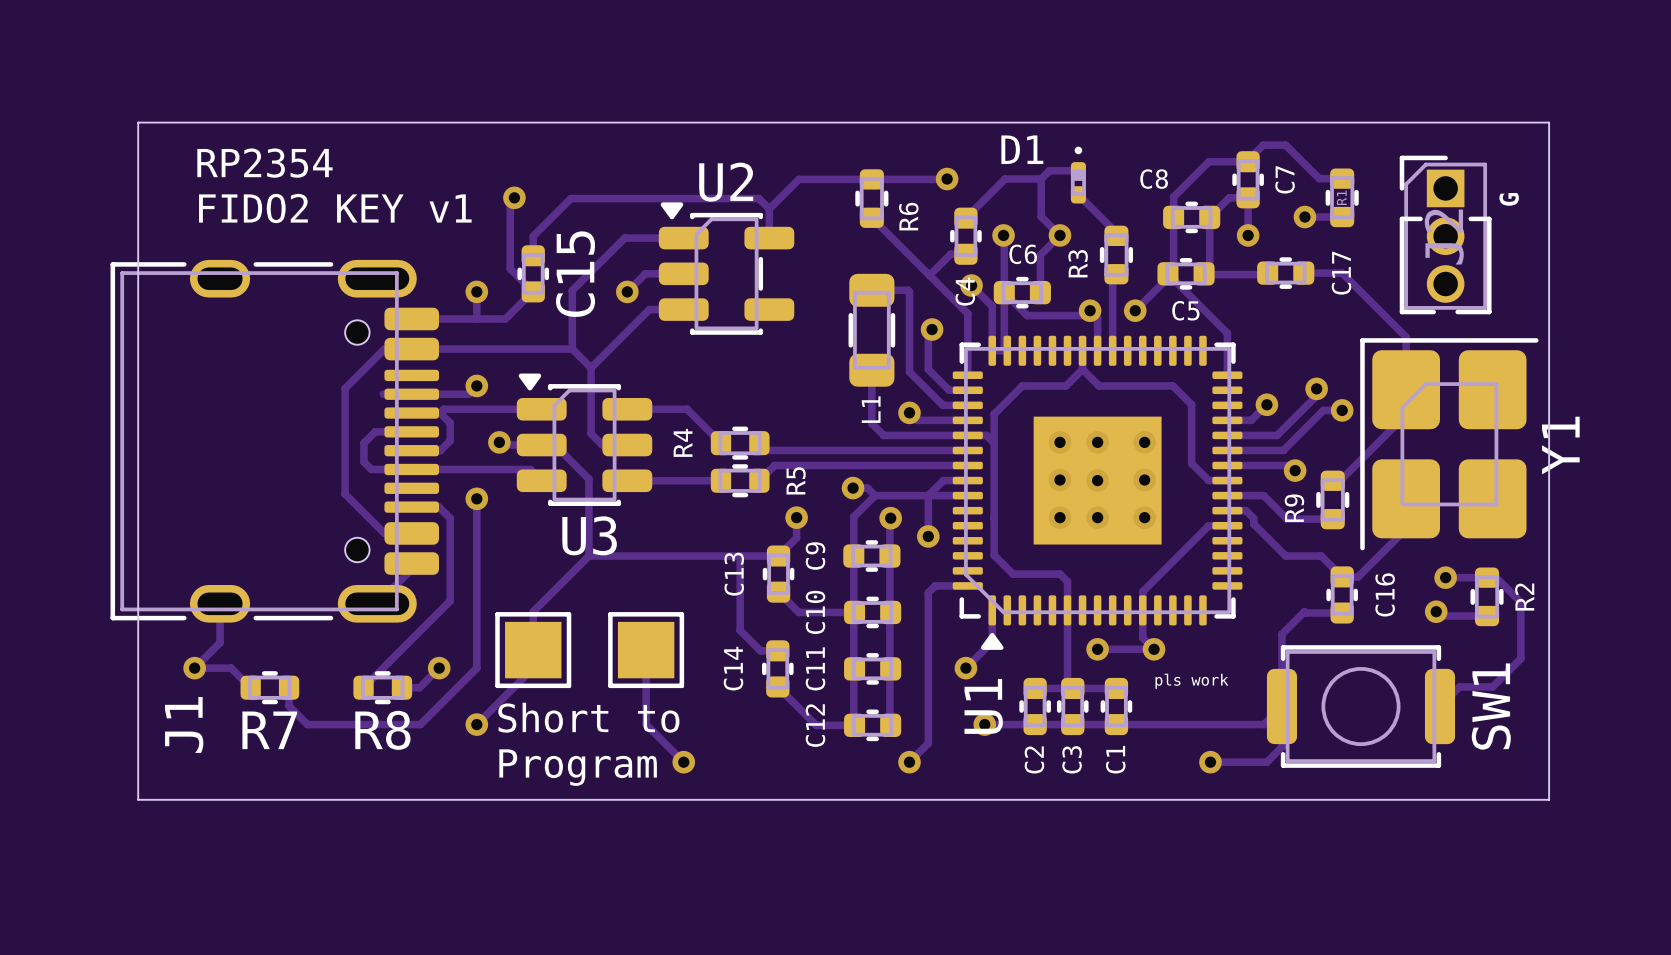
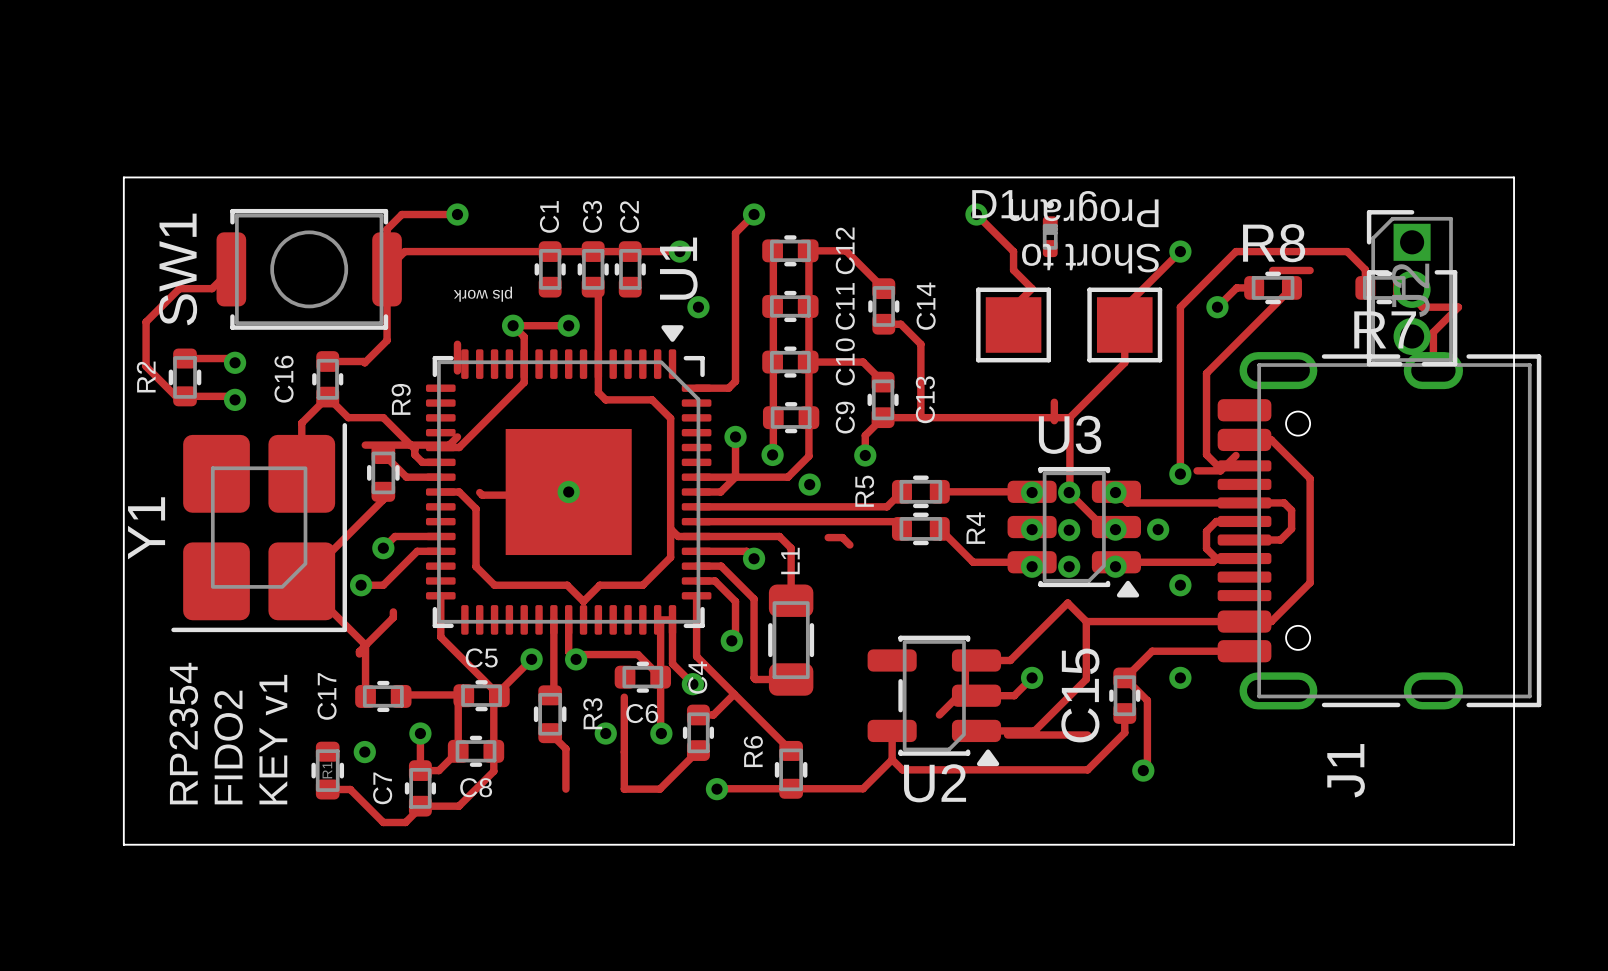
text: none -> Program (1084, 209)
track: none -> (457, 214) (401, 214) (387, 229) (387, 340) (364, 362) (327, 361)
via: none -> (457, 214)
track: none -> (754, 214) (735, 233) (735, 381) (728, 388) (696, 388)
via: none -> (754, 214)
via: none -> (976, 214)
text rotation: 0° (264, 163) -> 90° counterclockwise (183, 733)
text position: RP2354 (264, 163) -> RP2354 (183, 733)
track: (1078, 170) (1049, 170) (1041, 179) -> none
track: (1342, 178) (1319, 178) (1285, 145) (1263, 145) (1248, 161) (1208, 161) (1173, 197) (1173, 268) (1167, 273) -> none
track: (946, 179) (798, 179) (769, 208) -> none
via: (947, 179) -> none
track: (1041, 179) (1041, 197) -> (976, 214) (1013, 251)
track: (1041, 179) (1005, 179) (965, 218) -> none
C8 name position: C8 (1154, 179) -> C8 (476, 787)
C7 position: (1248, 179) -> (420, 788)
C7 name position: C7 (1285, 179) -> C7 (382, 788)
track: (1078, 194) (1116, 232) (1116, 235) -> none
track: (514, 197) (510, 201) (510, 268) (533, 291) -> none
via: (514, 197) -> none
track: none -> (679, 251) (404, 251) (387, 269)
via: none -> (679, 251)
track: none -> (772, 250) (772, 454)
via: none -> (1180, 251)
R1 position: (1342, 197) -> (327, 770)
R6 position: (871, 198) -> (791, 769)
text: G (1509, 199) -> none
text: FIDO2 KEY v1 (335, 208) -> none
track: (769, 208) (769, 238) -> (892, 730) (892, 759)
track: (769, 208) (758, 198) (570, 198) (533, 236) (533, 255) -> none
track: none -> (231, 269) (212, 288) (179, 288) (146, 322) (146, 366) (175, 396) (231, 396) (235, 399)
R6 name position: R6 (908, 216) -> R6 (753, 751)
track: (871, 217) (967, 313) (967, 375) -> none
C8 position: (1191, 217) -> (476, 751)
via: (1304, 217) -> none
track: none -> (593, 287) (598, 292) (598, 392) (605, 399) (652, 399) (670, 418) (670, 557) (642, 585) (599, 585) (583, 601) (567, 585) (494, 585) (476, 566) (476, 508) (459, 492) (440, 492)
track: none -> (1254, 287) (1236, 287) (1217, 307)
track: none -> (1291, 287) (1206, 373) (1206, 454) (1217, 465) (1244, 465)
track: none -> (1365, 287) (1365, 269) (1347, 251) (1235, 251) (1180, 307) (1180, 474)
track: none -> (1403, 287) (1422, 307) (1458, 307) (1433, 332) (1433, 370)
track: none -> (883, 288) (846, 250) (808, 250) (808, 456) (787, 477) (696, 477)
track: (1003, 235) (1004, 347) (1007, 350) (992, 350) (992, 306) (971, 285) -> none
via: (1003, 235) -> none
via: (1059, 235) -> none
track: (1248, 235) (1248, 197) (1229, 197) (1209, 217) (1209, 268) (1204, 273) (1266, 274) -> none
via position: (1248, 235) -> (1217, 307)
C4 position: (965, 236) -> (698, 732)
track: (683, 238) (624, 238) (572, 290) (572, 349) -> none
via: none -> (698, 307)
track: (965, 254) (950, 254) (929, 275) -> none
C6 name position: C6 (1023, 254) -> C6 (642, 713)
R3 position: (1116, 255) -> (550, 714)
R3 name position: R3 (1078, 263) -> R3 (592, 713)
U2 rotation: 0° (726, 268) -> 180° (934, 700)
U2 position: (726, 268) -> (934, 700)
track: none -> (883, 324) (900, 324) (920, 344) (920, 417)
part: none -> (1013, 324)
part: none -> (1124, 324)
C15 position: (533, 273) -> (1124, 695)
via: none -> (513, 325)
track: none -> (568, 325) (513, 325) (524, 336) (524, 382) (459, 447) (440, 447)
track: (683, 273) (645, 273) (627, 291) -> none
track: (1167, 273) (1167, 277) (1135, 310) -> none
track: (1167, 273) (1227, 333) (1227, 375) -> none
C5 position: (1186, 273) -> (481, 695)
C17 position: (1285, 273) -> (383, 696)
track: (1303, 273) (1342, 273) (1406, 337) (1406, 414) (1340, 480) (1332, 480) -> none
C17 name position: C17 (1341, 273) -> C17 (327, 696)
C15 name position: C15 (575, 274) -> C15 (1080, 695)
track: (1116, 274) (1112, 277) (1112, 350) -> none
via: (971, 285) -> none
track: (871, 290) (907, 290) (909, 291) (909, 371) (942, 405) (967, 405) -> none
via: (476, 291) -> none
track: (532, 291) (505, 318) (411, 318) -> none
via position: (627, 291) -> (568, 325)
C4 name position: C4 (965, 291) -> C4 (697, 677)
track: (1004, 292) (1027, 315) (1085, 315) (1090, 310) (1097, 318) (1097, 350) -> none
C6 position: (1022, 292) -> (642, 677)
track: none -> (185, 358) (230, 358) (235, 362)
track: (683, 309) (649, 309) (591, 367) -> none
track: none -> (808, 362) (863, 362) (883, 382)
via: none -> (235, 362)
via: (1090, 310) -> none
via: (1135, 310) -> none
C5 name position: C5 (1185, 310) -> C5 (481, 657)
track: (932, 329) (928, 333) (928, 369) (949, 390) (967, 390) -> none
via: (932, 329) -> none
L1 position: (871, 330) -> (791, 640)
via: none -> (235, 399)
track: (572, 349) (591, 367) -> none
track: (572, 349) (384, 349) (345, 388) (345, 494) (384, 533) (411, 533) -> none
track: none -> (1069, 417) (883, 417) (865, 435) (865, 455)
track: none -> (1069, 417) (1069, 493) (1103, 527)
track: (591, 367) (591, 433) (602, 445) (627, 445) -> none
track: (871, 370) (871, 423) (883, 435) (986, 435) (994, 443) -> none
via: (476, 385) -> none
track: none -> (735, 436) (735, 477) (720, 492) (696, 492)
via: none -> (735, 436)
track: none -> (1244, 439) (1271, 439) (1310, 478) (1310, 582) (1271, 621) (1086, 621)
track: (1316, 388) (1316, 395) (1277, 435) (1227, 435) -> none
via: (1316, 388) -> none
track: none -> (383, 454) (406, 477) (440, 477)
via: none -> (772, 454)
via: (1266, 404) -> none
track: (541, 409) (443, 409) (440, 413) -> none
track: (627, 409) (687, 409) (720, 443) -> none
L1 name position: L1 (871, 409) -> L1 (790, 561)
track: (1342, 410) (1323, 410) (1283, 450) (1227, 450) -> none
via: (1342, 410) -> none
track: none -> (440, 462) (422, 462) (414, 454) (414, 449) (383, 417) (348, 417) (327, 397) (301, 423) (301, 473)
track: (909, 412) (917, 420) (967, 420) -> none
via position: (909, 412) -> (865, 455)
track: (440, 413) (450, 423) (450, 440) (440, 450) (411, 450) -> none
via: none -> (1180, 474)
track: (411, 431) (375, 431) (363, 443) (363, 461) (371, 469) (530, 469) (541, 480) -> none
via: none -> (809, 484)
U3 rotation: 0° (584, 439) -> 180° (1074, 532)
U3 position: (584, 439) -> (1074, 532)
J1 rotation: 0° (274, 441) -> 180° (1379, 530)
J1 position: (274, 441) -> (1379, 530)
track: none -> (383, 491) (383, 499) (301, 581) (365, 645) (365, 696)
via: none -> (568, 492)
track: none -> (901, 491) (886, 506) (696, 506)
track: none -> (1116, 491) (1127, 502) (1284, 502) (1291, 510) (1291, 528) (1280, 540) (1244, 540)
via: (499, 442) -> none
R4 name position: R4 (683, 442) -> R4 (975, 528)
R4 position: (740, 443) -> (920, 528)
track: (759, 443) (766, 450) (967, 450) -> none
Y1 rotation: 0° (1449, 444) -> 180° (259, 527)
Y1 position: (1449, 444) -> (259, 527)
track: (555, 445) (588, 478) (588, 556) -> none
track: (967, 465) (774, 465) (759, 480) -> none
track: (1227, 465) (1290, 465) (1295, 470) -> none
via: (1295, 470) -> none
track: none -> (696, 521) (894, 521) (901, 528)
track: none -> (1244, 521) (1216, 521) (1206, 531) (1206, 548) (1216, 558)
track: none -> (670, 528) (678, 536) (779, 536) (791, 548) (791, 600)
track: none -> (939, 528) (973, 562) (1032, 562)
track: (627, 480) (720, 480) -> (939, 491) (1032, 491)
R5 position: (740, 480) -> (920, 491)
R5 name position: R5 (796, 480) -> R5 (864, 491)
track: (967, 480) (943, 480) (928, 495) (928, 536) -> none
via: none -> (1158, 529)
track: (1227, 480) (1208, 480) (1191, 463) (1191, 404) (1172, 385) (1099, 385) (1082, 369) (1066, 385) (1022, 385) (994, 414) (994, 555) (1012, 574) (1059, 574) (1067, 581) (1067, 683) (1072, 688) -> none
track: none -> (440, 536) (395, 536) (383, 548)
via: (853, 488) -> none
U1 rotation: 0° (1097, 492) -> 180° (568, 479)
U1 position: (1097, 492) -> (568, 479)
track: (967, 495) (875, 495) (853, 516) (854, 725) (816, 725) (777, 686) -> none
track: (1227, 495) (1263, 495) (1287, 519) (1332, 519) -> none
via: none -> (383, 548)
track: (476, 498) (476, 668) (420, 724) (307, 724) (289, 706) (289, 687) -> none
via: (476, 498) -> none
track: (1406, 498) (1406, 528) (1358, 576) (1342, 576) (1321, 556) (1285, 556) (1253, 524) (1253, 518) (1246, 510) (1227, 510) -> none
R9 position: (1332, 499) -> (383, 472)
track: none -> (440, 551) (417, 551) (383, 585) (361, 585)
track: none -> (696, 551) (746, 551) (754, 558)
track: (411, 507) (439, 507) (450, 518) (450, 600) (363, 687) -> none
R9 name position: R9 (1294, 508) -> R9 (401, 399)
track: none -> (1216, 558) (1212, 562) (1116, 562)
track: none -> (696, 566) (721, 566) (754, 599) (754, 677) (755, 679) (791, 679)
track: (796, 517) (796, 537) (778, 556) (588, 556) -> none
via position: (796, 517) -> (754, 558)
track: (890, 518) (890, 725) -> none
via: (890, 518) -> none
track: (1227, 525) (1208, 525) (1142, 591) (1142, 638) (1154, 649) (1097, 649) -> none
track: none -> (696, 580) (715, 580) (735, 601) (735, 637) (731, 640)
via: none -> (361, 585)
via: (928, 536) -> none
via: none -> (1180, 585)
track: none -> (440, 595) (440, 637) (499, 695)
track: none -> (696, 595) (696, 656) (791, 750)
track: (588, 556) (533, 611) (533, 668) (476, 724) -> (1180, 251) (1124, 307) (1124, 362) (1069, 417)
track: (740, 556) (740, 630) (760, 650) (777, 650) -> none
C9 name position: C9 (815, 556) -> C9 (845, 417)
C9 position: (871, 556) -> (791, 417)
track: none -> (553, 619) (553, 691) (550, 695)
track: none -> (568, 619) (568, 651) (576, 659) (580, 654) (638, 654) (660, 677)
track: none -> (1086, 621) (1086, 679) (1034, 730) (976, 730)
track: none -> (1086, 621) (1067, 603) (1010, 660) (976, 660)
C13 name position: C13 (734, 574) -> C13 (925, 399)
C13 position: (778, 574) -> (883, 399)
track: (1439, 577) (1496, 577) (1520, 602) (1520, 658) (1492, 686) (1459, 686) (1439, 706) -> none
via: (1445, 577) -> none
track: (967, 585) (935, 585) (928, 592) (928, 743) (909, 762) -> none
via: none -> (731, 640)
track: (778, 592) (798, 612) (854, 612) -> none
C16 position: (1342, 594) -> (327, 379)
C16 name position: C16 (1385, 594) -> C16 (284, 379)
R2 position: (1487, 596) -> (185, 377)
R2 name position: R2 (1524, 597) -> R2 (146, 377)
track: (220, 603) (220, 642) (194, 668) (231, 668) (250, 687) -> none
track: none -> (1244, 651) (1152, 651) (1125, 677)
track: none -> (531, 659) (499, 691) (499, 695)
via: none -> (531, 659)
via: none -> (576, 659)
track: (1436, 611) (1440, 616) (1487, 616) -> none
via: (1436, 611) -> none
C10 name position: C10 (815, 612) -> C10 (845, 361)
C10 position: (872, 612) -> (790, 362)
track: (1342, 613) (1304, 611) (1281, 634) (1281, 747) (1266, 762) (1210, 762) -> none
track: none -> (1032, 677) (1014, 695) (976, 695)
track: none -> (1124, 677) (1147, 700) (1147, 766) (1143, 770)
via: none -> (1180, 677)
track: none -> (692, 684) (672, 663) (672, 619) (657, 619) (660, 622) (661, 733)
via: none -> (692, 684)
track: none -> (734, 694) (713, 714) (698, 714)
track: none -> (401, 694) (463, 695) (458, 701) (458, 751) (438, 770) (420, 770) (420, 733)
track: none -> (499, 695) (493, 701) (493, 771) (458, 806) (420, 806) (405, 822) (383, 822) (350, 789) (327, 789)
via position: (1097, 649) -> (1032, 677)
via: (1154, 649) -> none
part: (533, 650) -> none
part: (646, 650) -> none
track: none -> (1124, 713) (1124, 732) (1087, 769) (902, 769) (892, 759)
via: (194, 668) -> none
track: (439, 668) (419, 687) (401, 687) -> none
via position: (439, 668) -> (420, 733)
C14 name position: C14 (733, 668) -> C14 (926, 306)
C14 position: (777, 668) -> (883, 306)
C11 name position: C11 (815, 668) -> C11 (845, 306)
C11 position: (872, 668) -> (790, 306)
via: (965, 668) -> none
text rotation: 0° (1191, 681) -> 180° (482, 294)
text position: pls work (1191, 681) -> pls work (482, 294)
track: none -> (550, 733) (565, 748) (565, 789)
via: none -> (605, 733)
via: none -> (661, 733)
R7 position: (269, 687) -> (1384, 287)
R8 position: (382, 687) -> (1273, 287)
text: none -> KEY v1 (273, 739)
text: none -> FIDO2 (228, 747)
via: none -> (364, 752)
C2 position: (1035, 706) -> (630, 269)
C3 position: (1072, 706) -> (593, 269)
C1 position: (1116, 706) -> (550, 269)
track: (1281, 706) (1263, 724) (984, 724) -> none
SW1 position: (1360, 706) -> (309, 269)
SW1 name position: SW1 (1491, 706) -> SW1 (178, 269)
track: none -> (892, 759) (863, 788) (717, 788)
text rotation: 0° (588, 717) -> 180° (1091, 258)
text position: Short to (588, 717) -> Short to (1091, 258)
via: (476, 724) -> none
track: (646, 724) (683, 762) -> (624, 770) (624, 789) (659, 789) (698, 750)
via: (984, 724) -> none
via: none -> (1143, 770)
C12 name position: C12 (815, 725) -> C12 (845, 250)
C12 position: (872, 725) -> (790, 250)
R8 name position: R8 (382, 730) -> R8 (1274, 243)
via: none -> (716, 789)
C2 name position: C2 (1034, 759) -> C2 (629, 216)
C3 name position: C3 (1072, 759) -> C3 (592, 216)
C1 name position: C1 (1115, 759) -> C1 (549, 216)
via: (683, 762) -> none
via: (909, 762) -> none
via: (1210, 762) -> none
text: Program (578, 767) -> none

